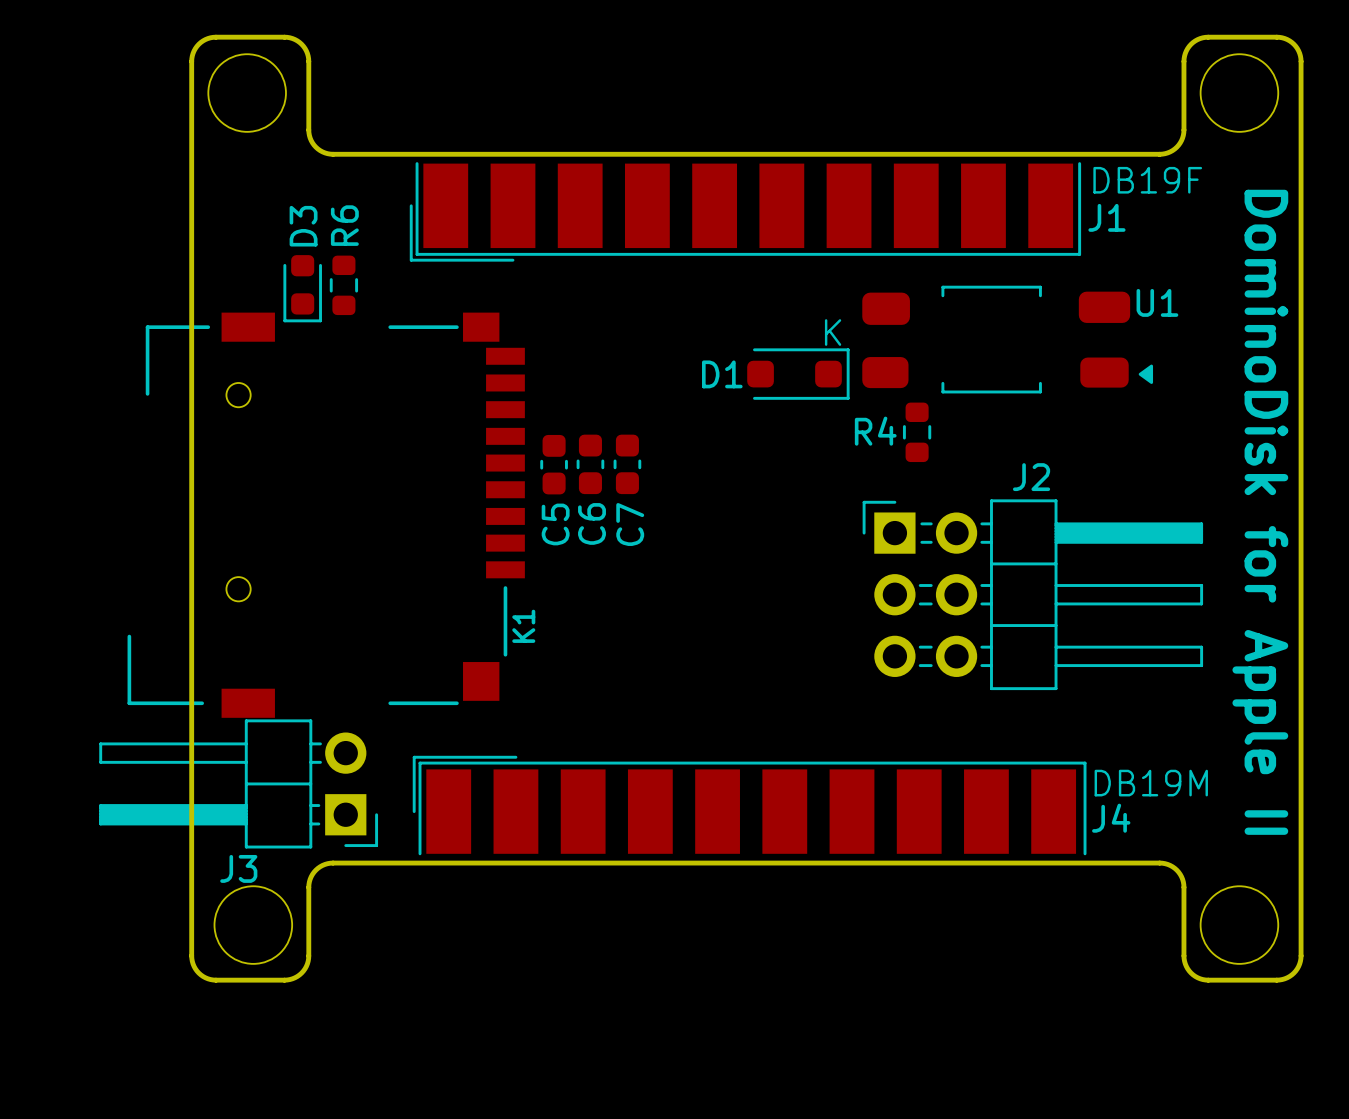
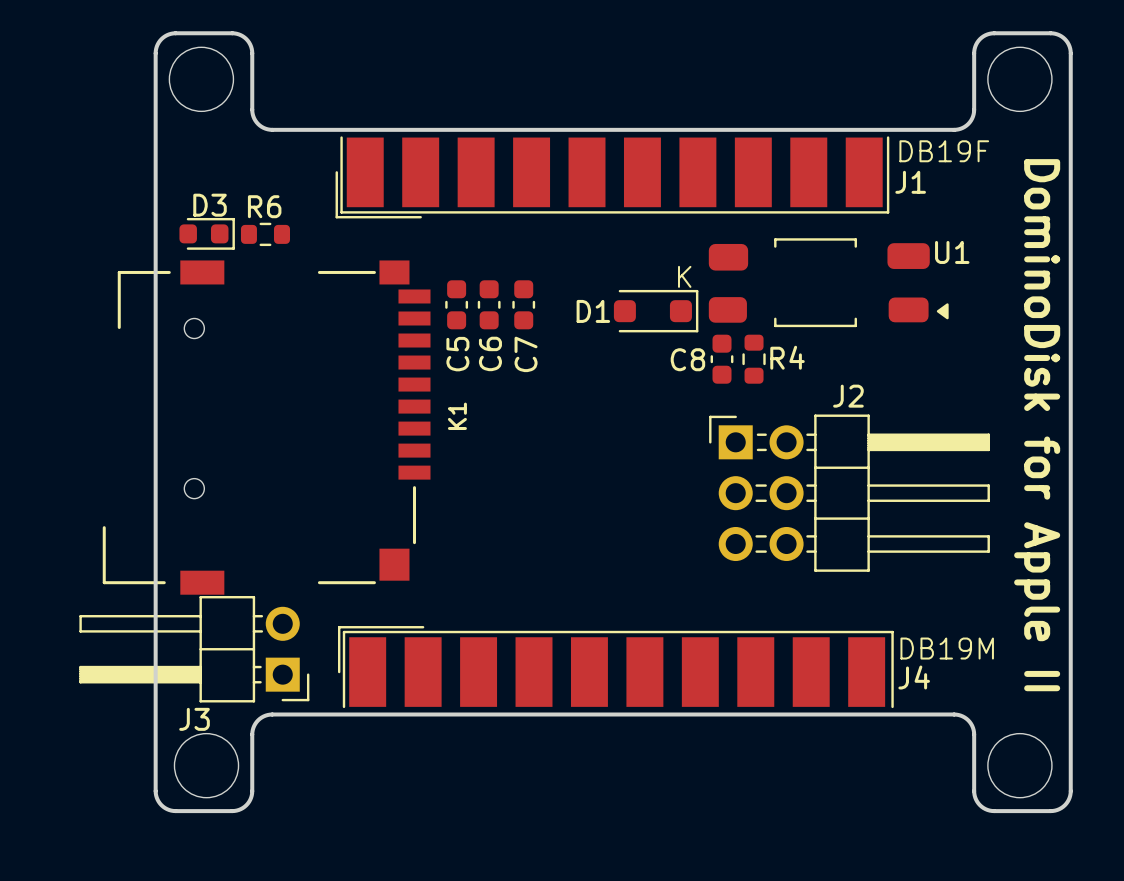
R6 rotation: 0° (343, 285) -> 90° clockwise (265, 234)
D3 rotation: 0° (302, 288) -> 90° counterclockwise (207, 233)
D3 position: (302, 288) -> (207, 233)
R4 name position: R4 (875, 431) -> R4 (787, 357)
C8: none -> (722, 359)
C5 position: (554, 464) -> (456, 304)
C6 position: (590, 464) -> (489, 304)
C7 position: (627, 464) -> (523, 304)
K1 name position: K1 (523, 626) -> K1 (457, 416)

